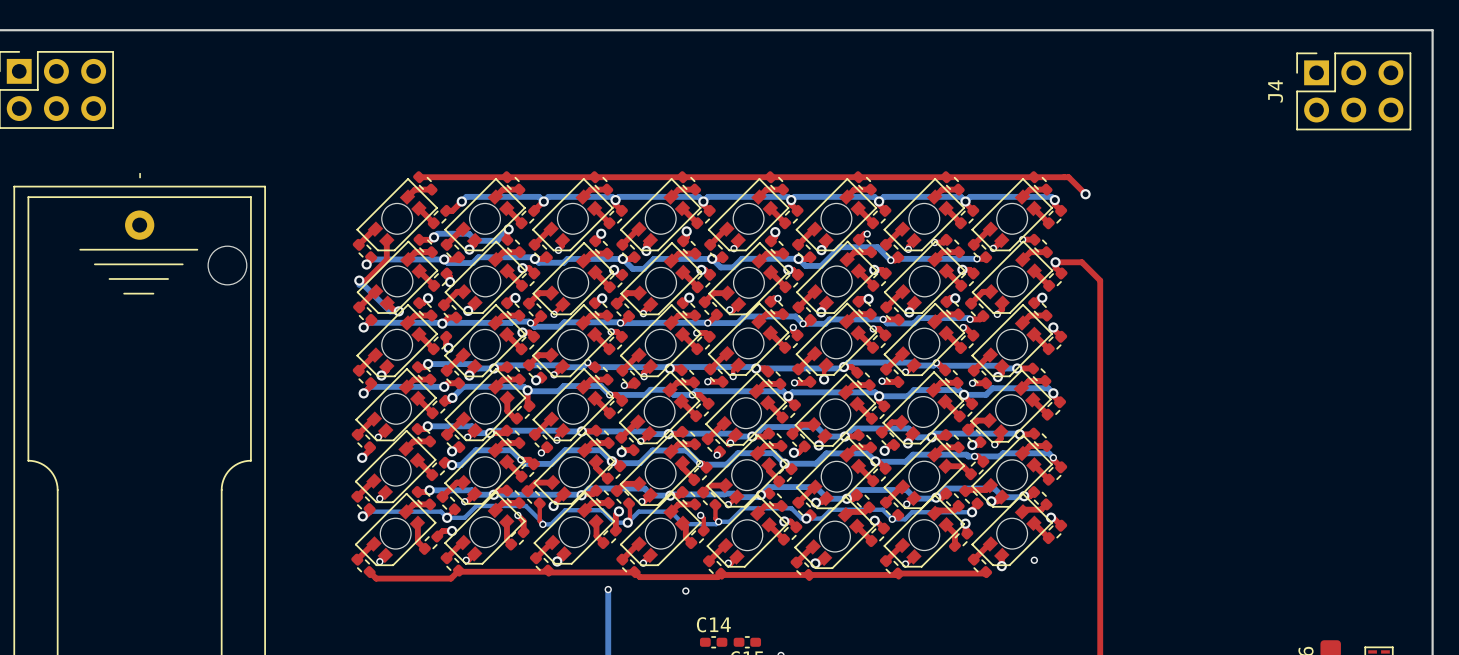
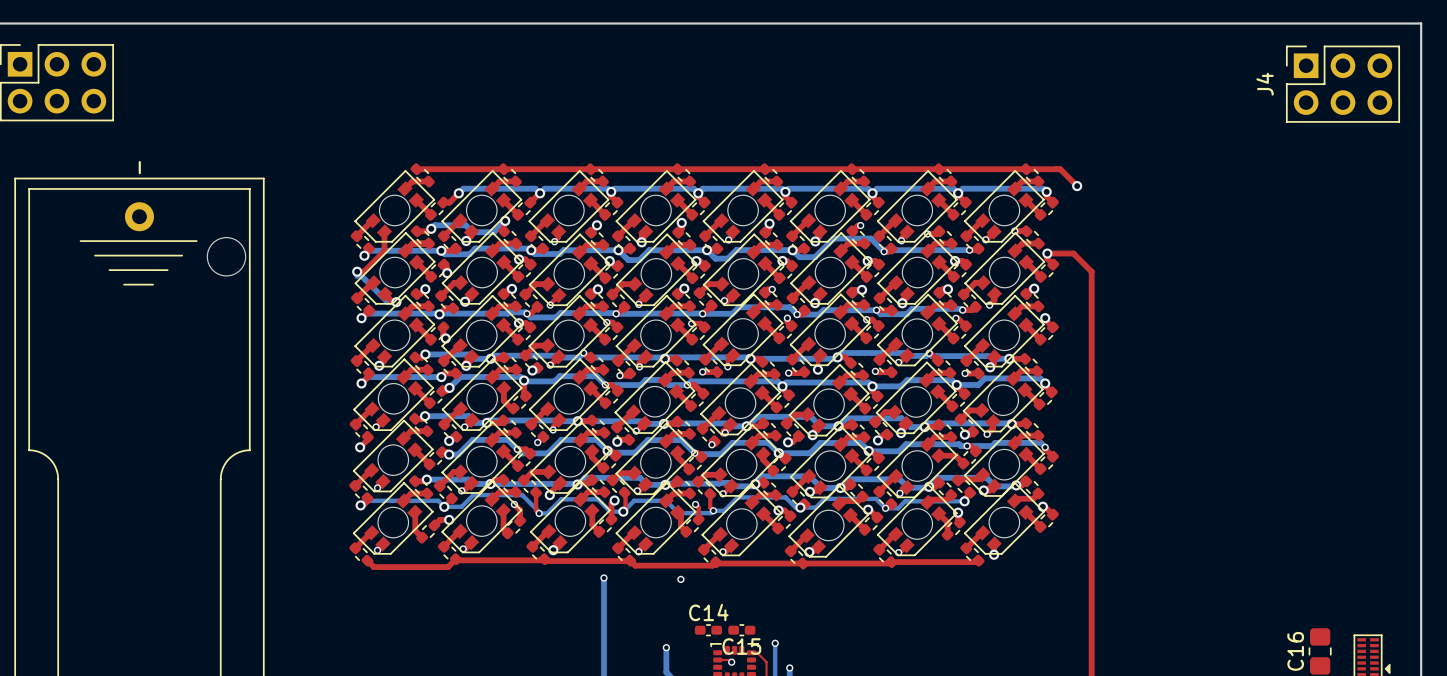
via: (1034, 560) -> none

